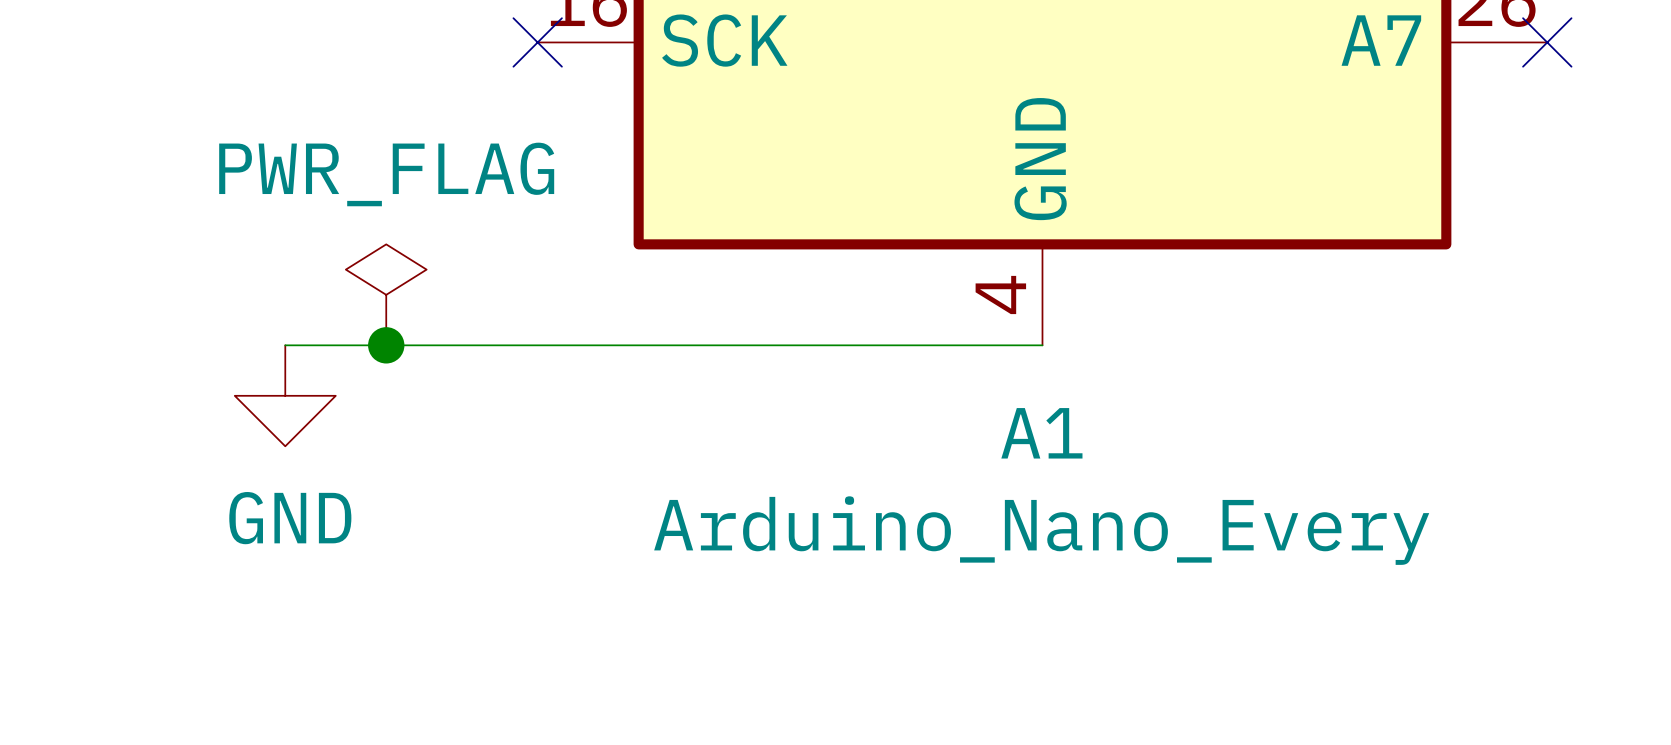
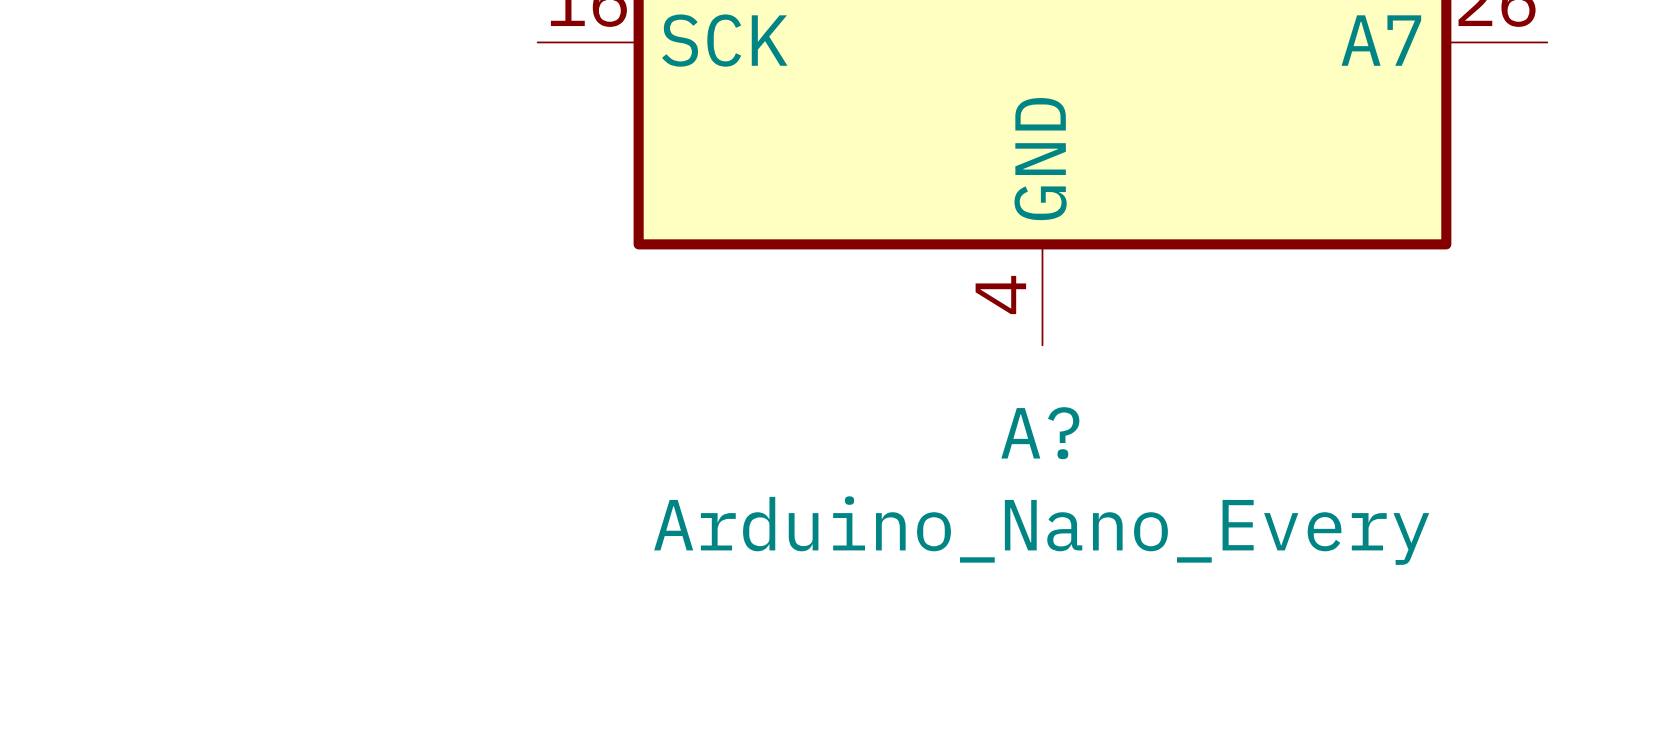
no-connect mark: (537, 42) -> none
no-connect mark: (1547, 42) -> none
power symbol: PWR_FLAG (386, 294) -> none
wire: (285, 345) (1042, 345) -> none
junction: (386, 345) -> none
power symbol: GND (285, 395) -> none
A1 name: A1 (1041, 433) -> A? (1040, 433)

